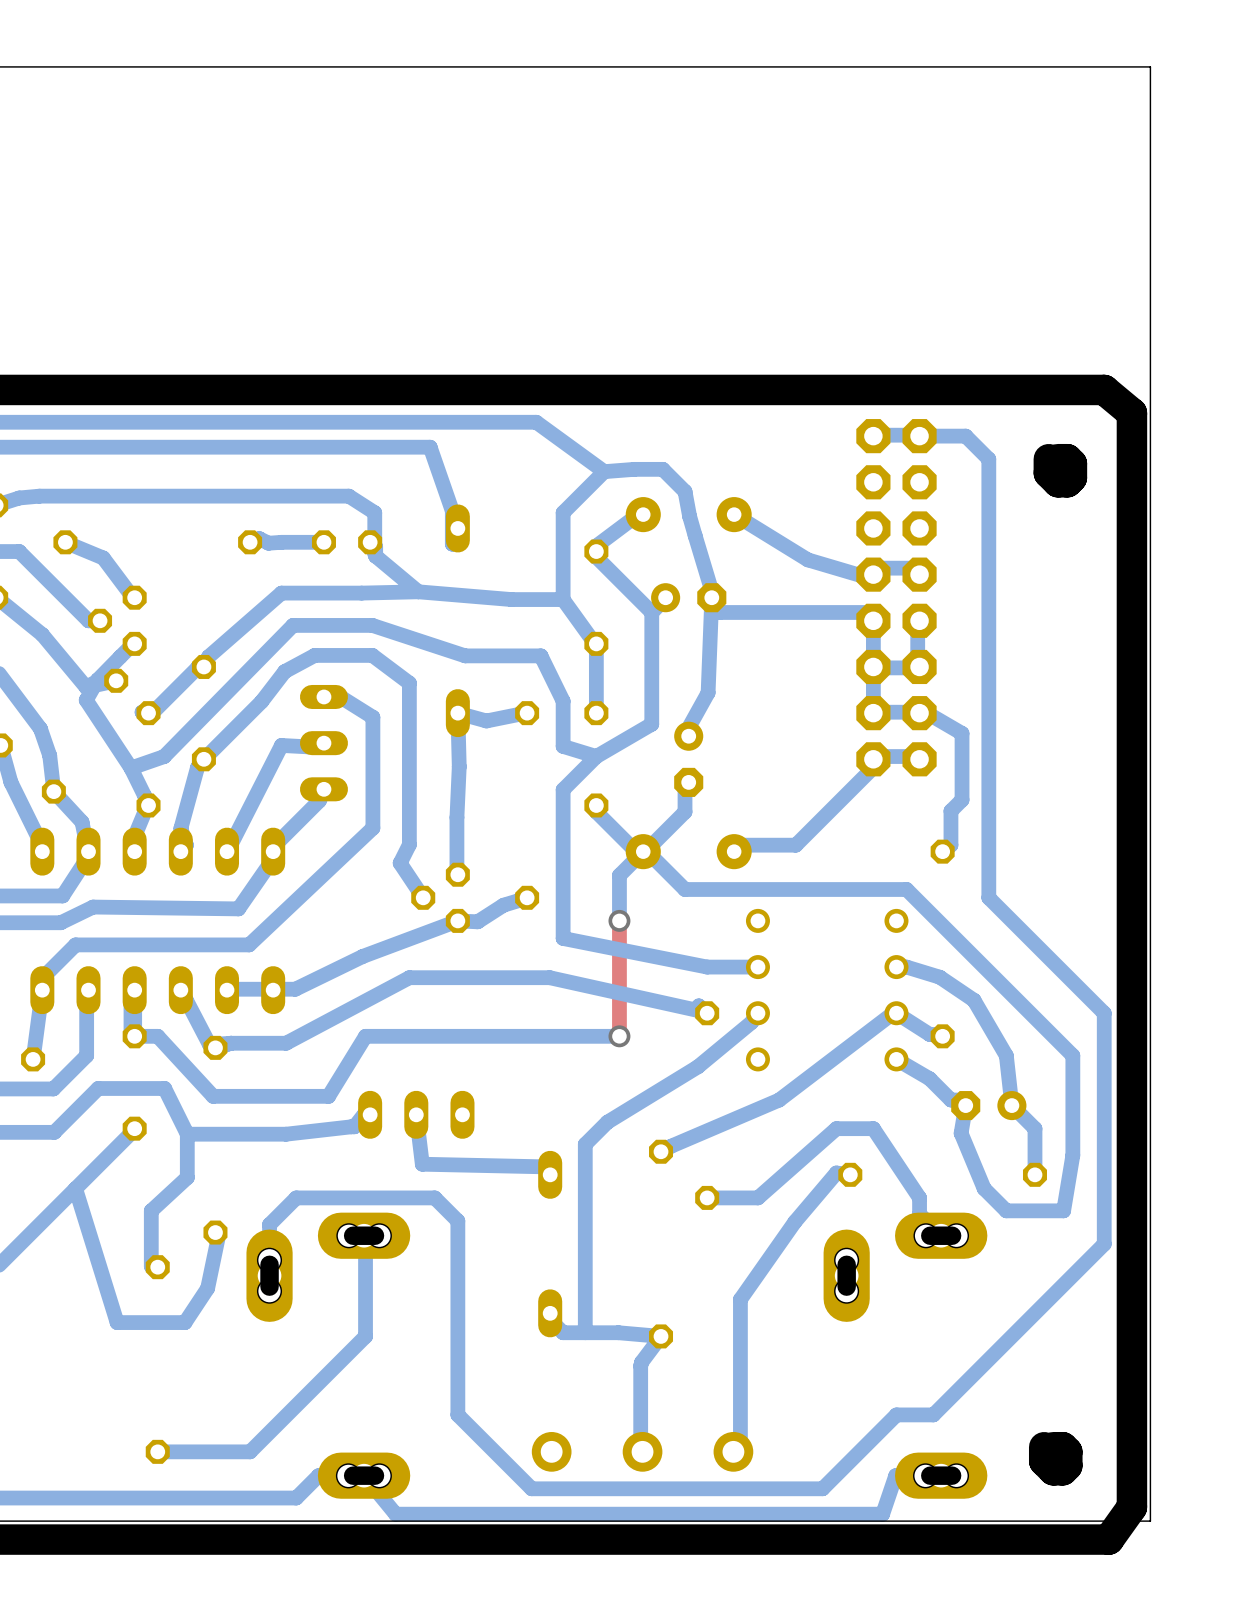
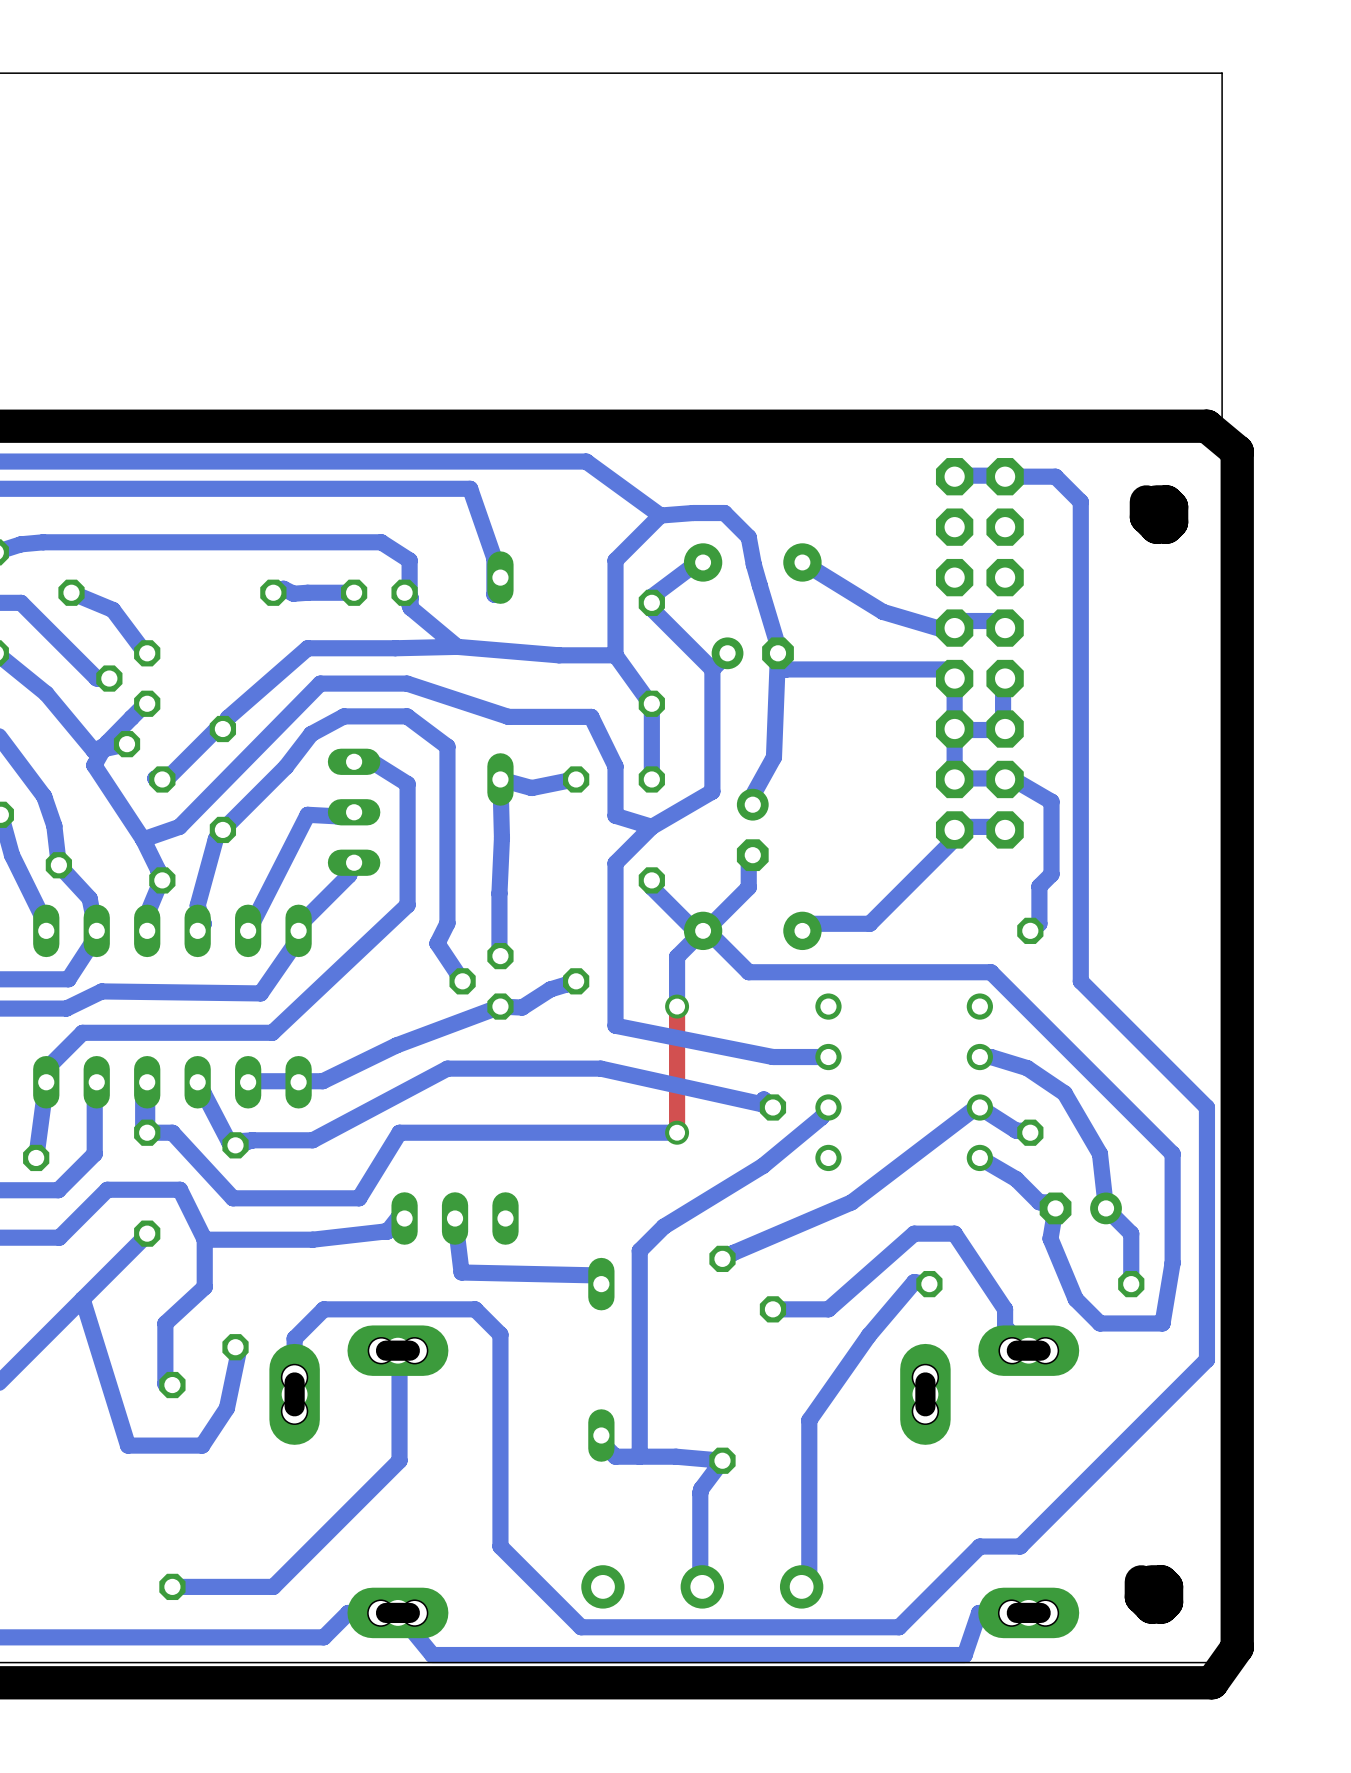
board edge: (1118, 66) (1150, 66) (1150, 1521) (1118, 1521) -> (1222, 73) (1222, 1662)

